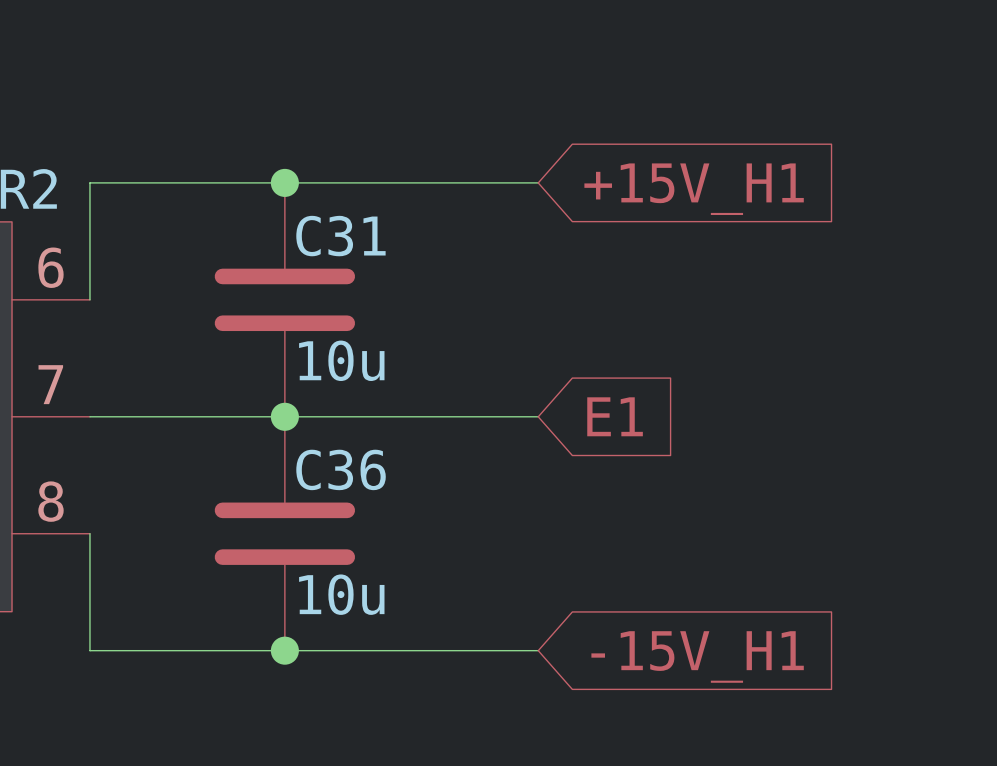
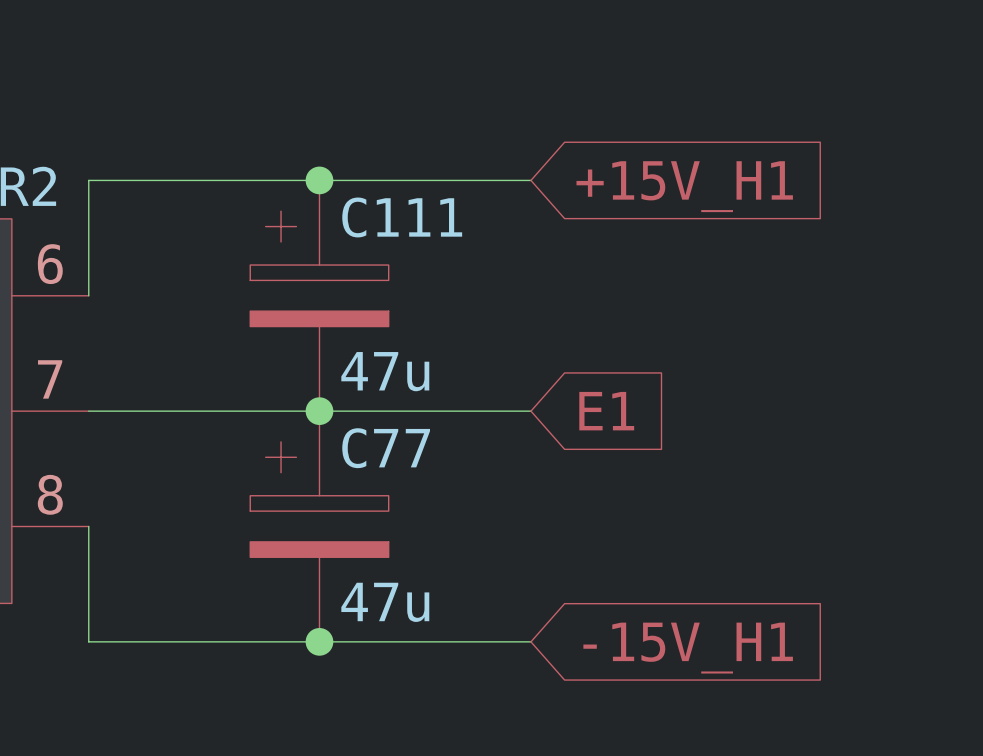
junction position: (284, 182) -> (319, 180)
C31: 10u (284, 299) -> none
C111: none -> 47u (319, 295)
junction position: (284, 416) -> (319, 411)
C36: 10u (284, 533) -> none
C77: none -> 47u (319, 526)
junction position: (284, 650) -> (319, 641)

